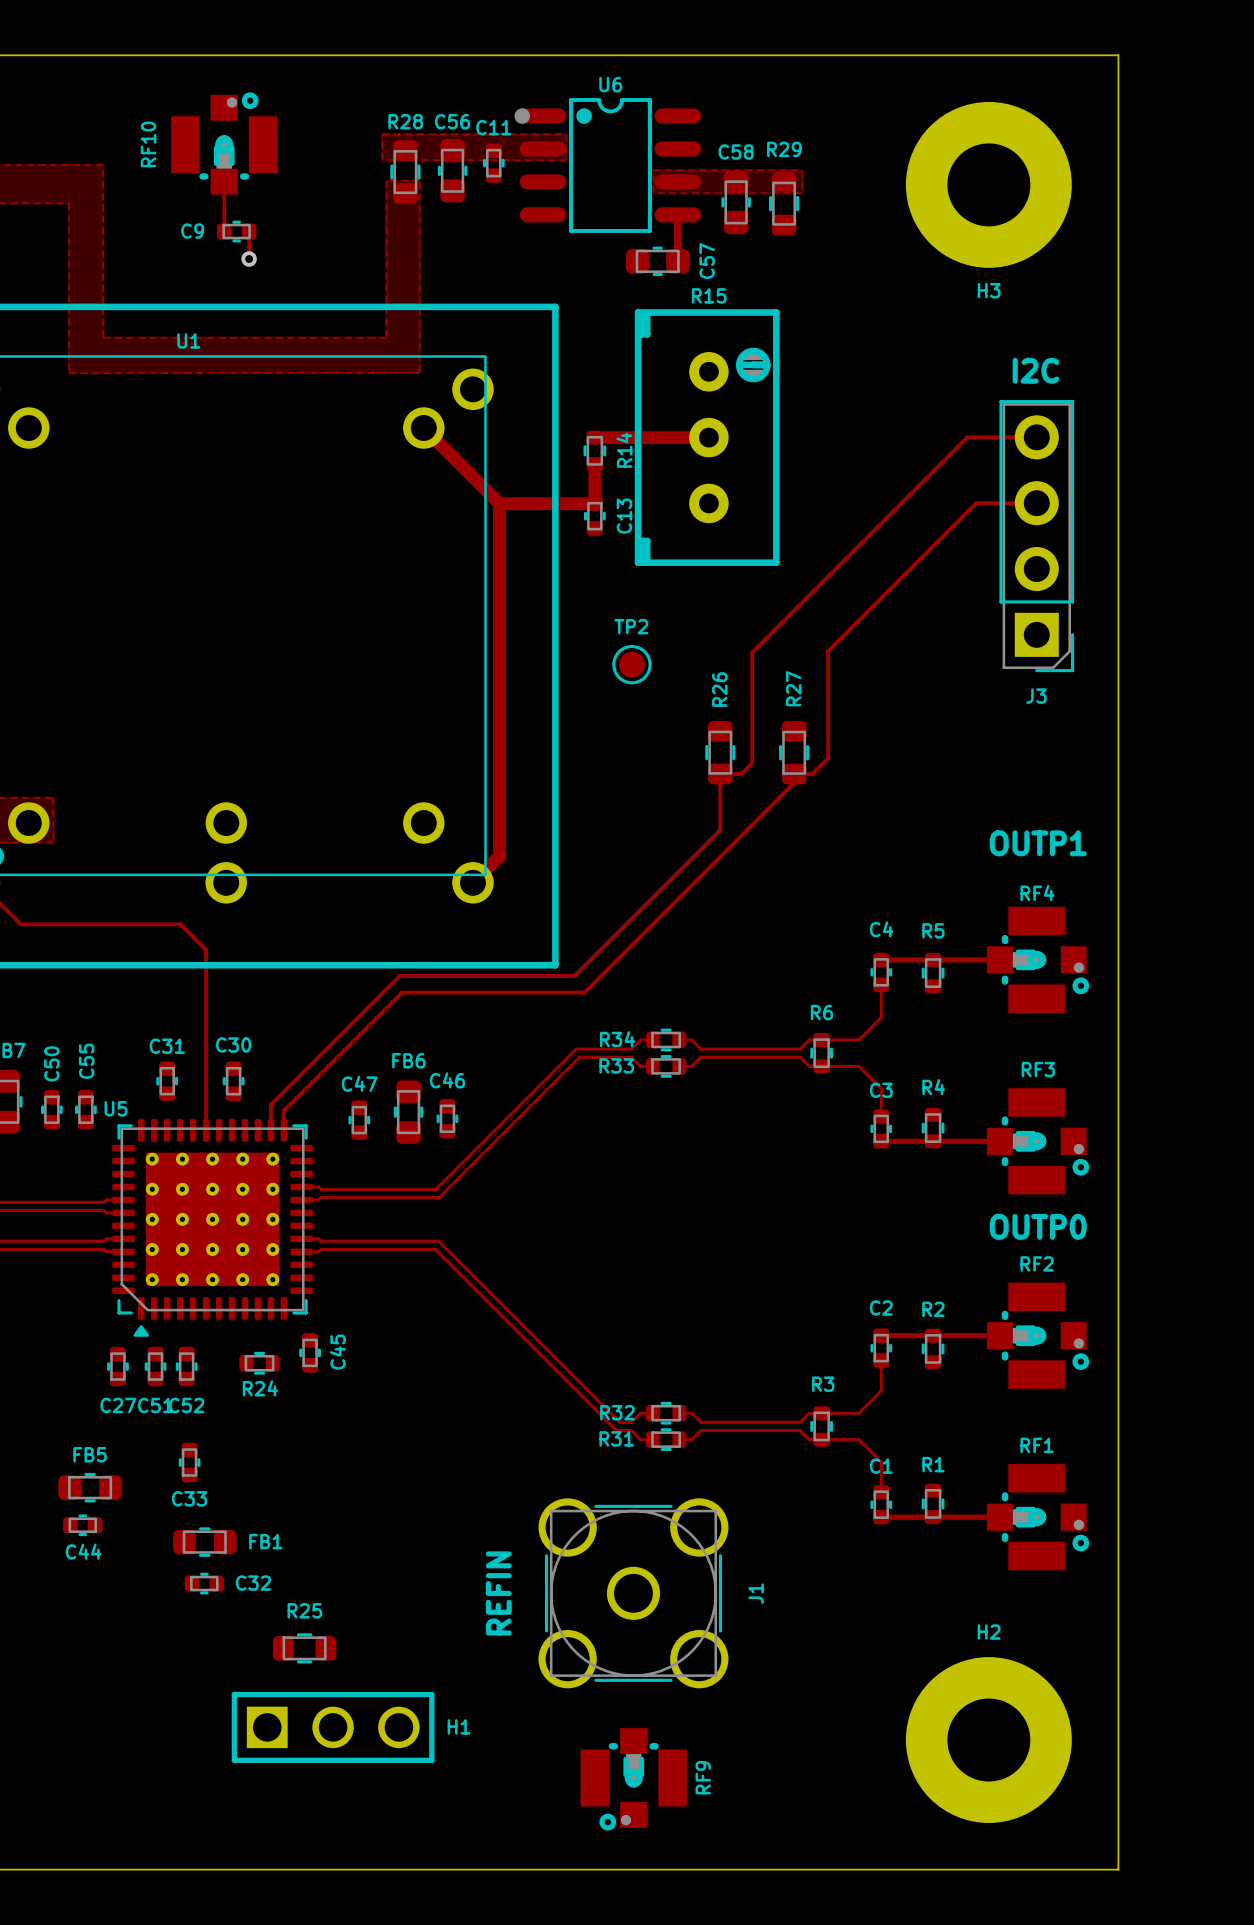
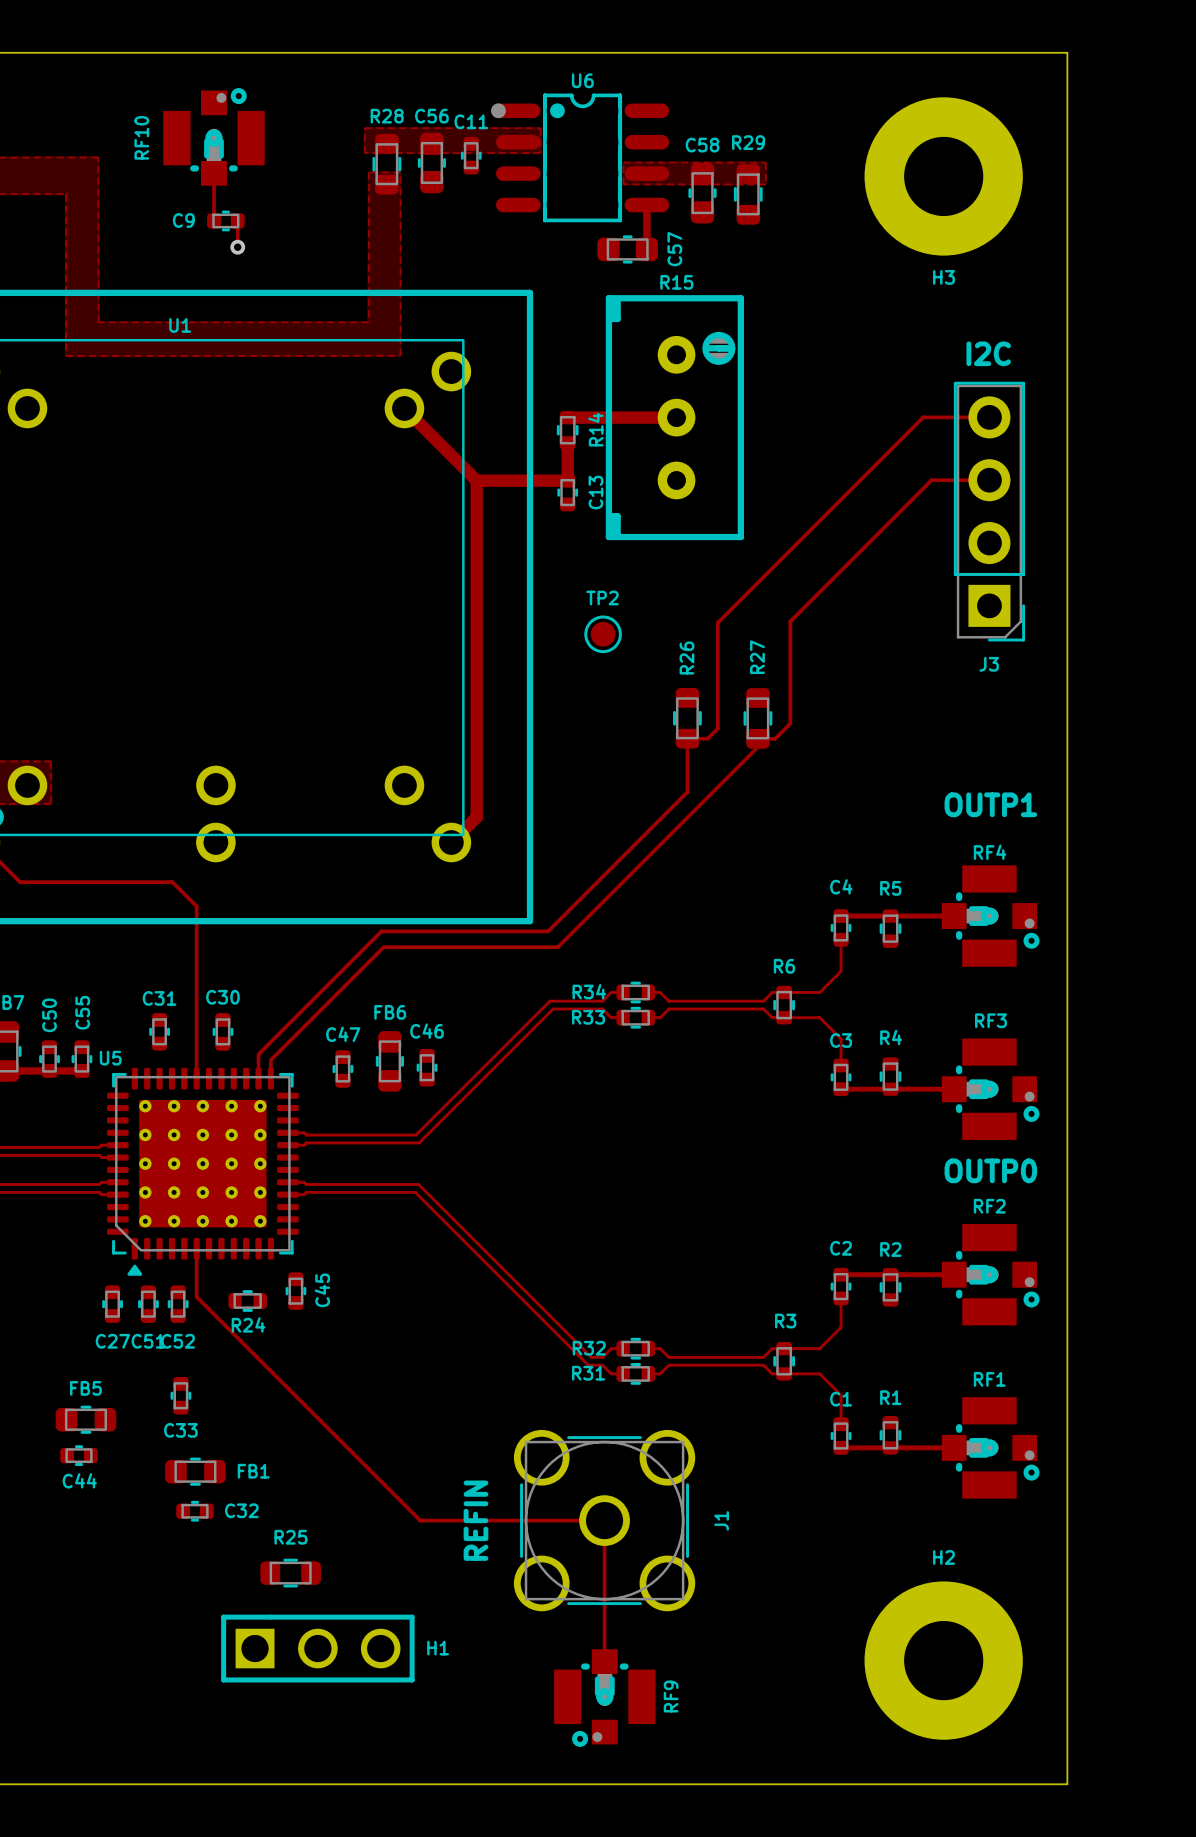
track: none -> (7, 1070) (81, 1070)
track: none -> (196, 1248) (196, 1296) (420, 1520) (604, 1520) (604, 1662)

